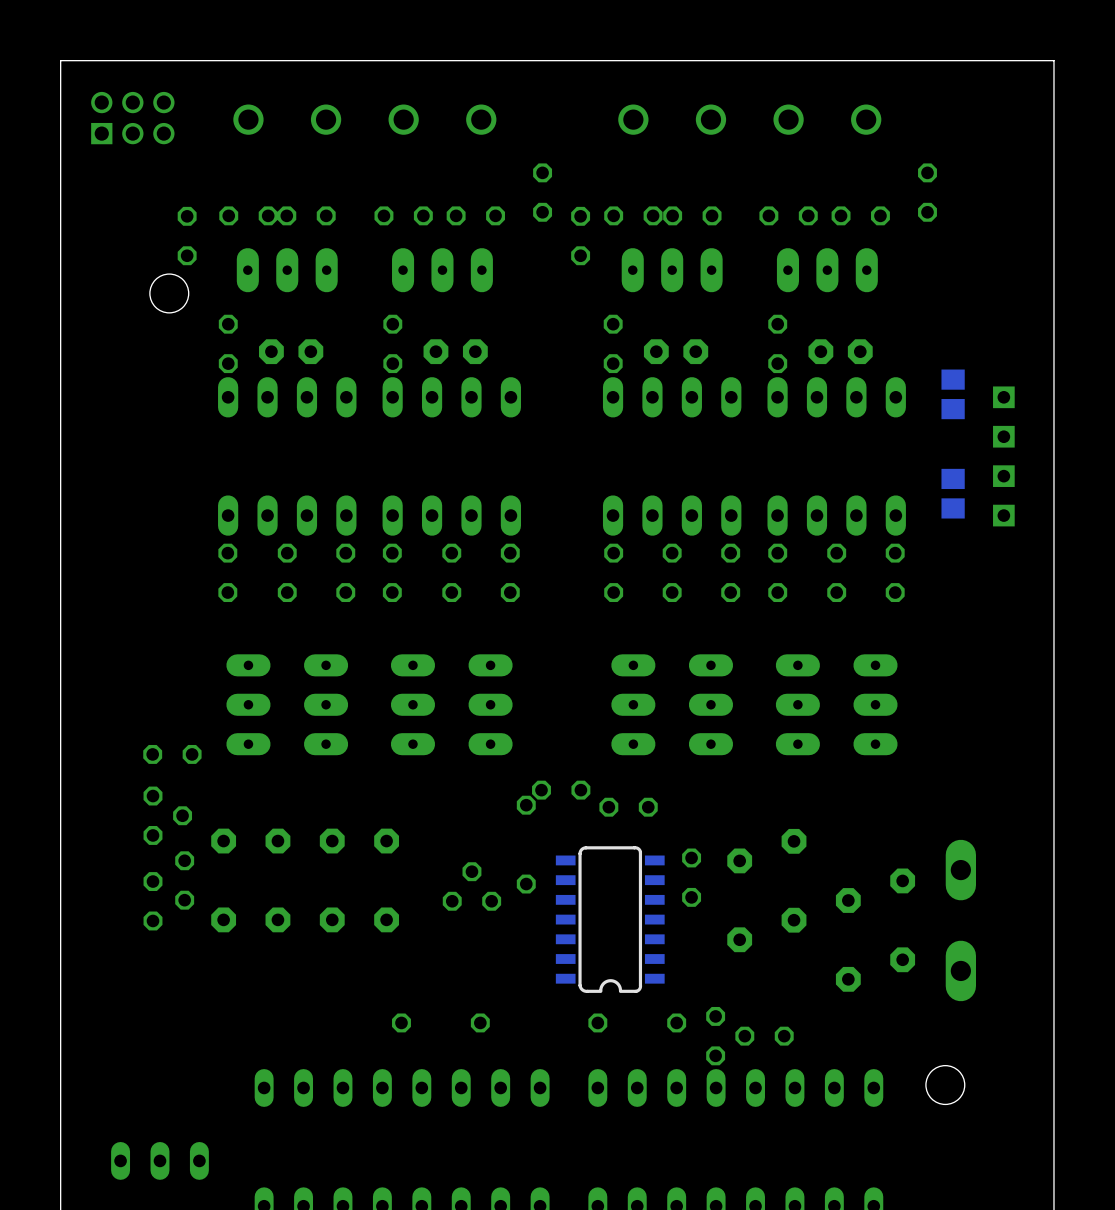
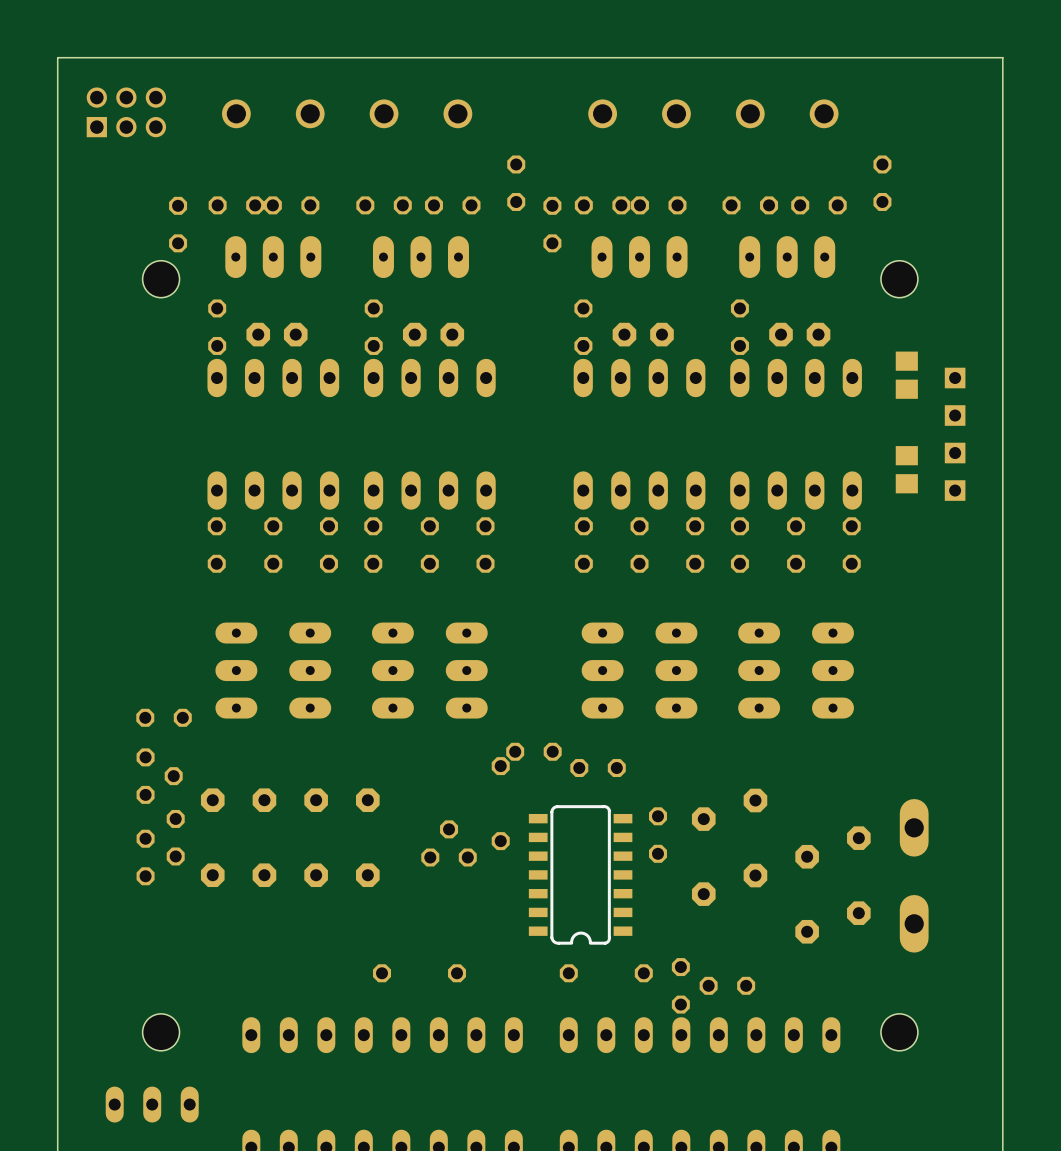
hole: none -> (899, 279)
hole: none -> (161, 1032)

